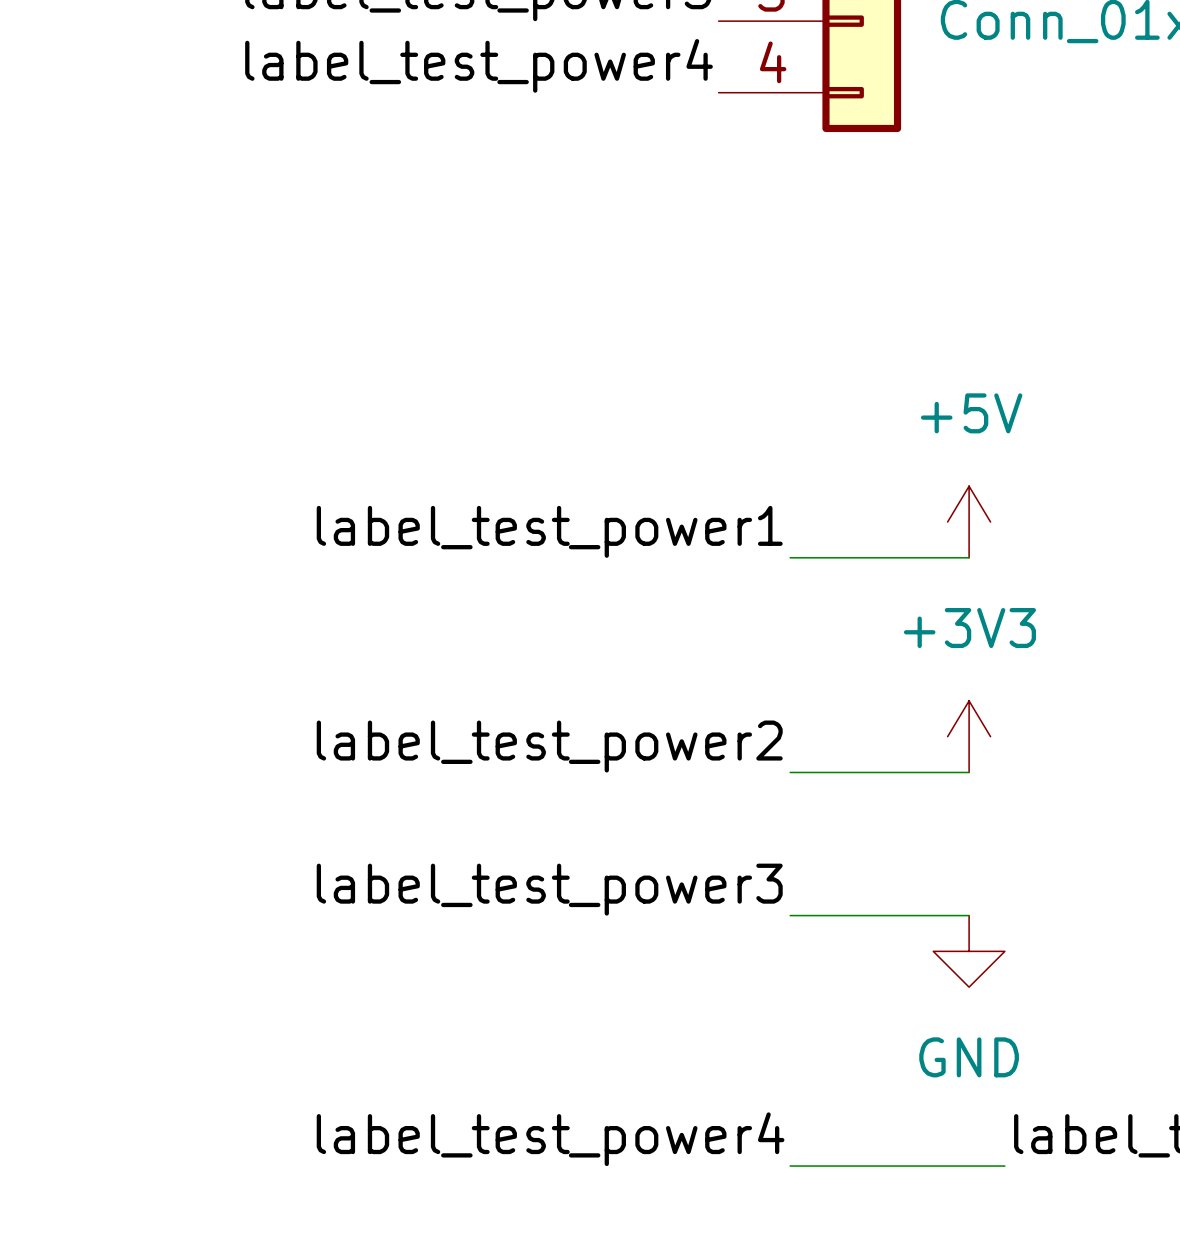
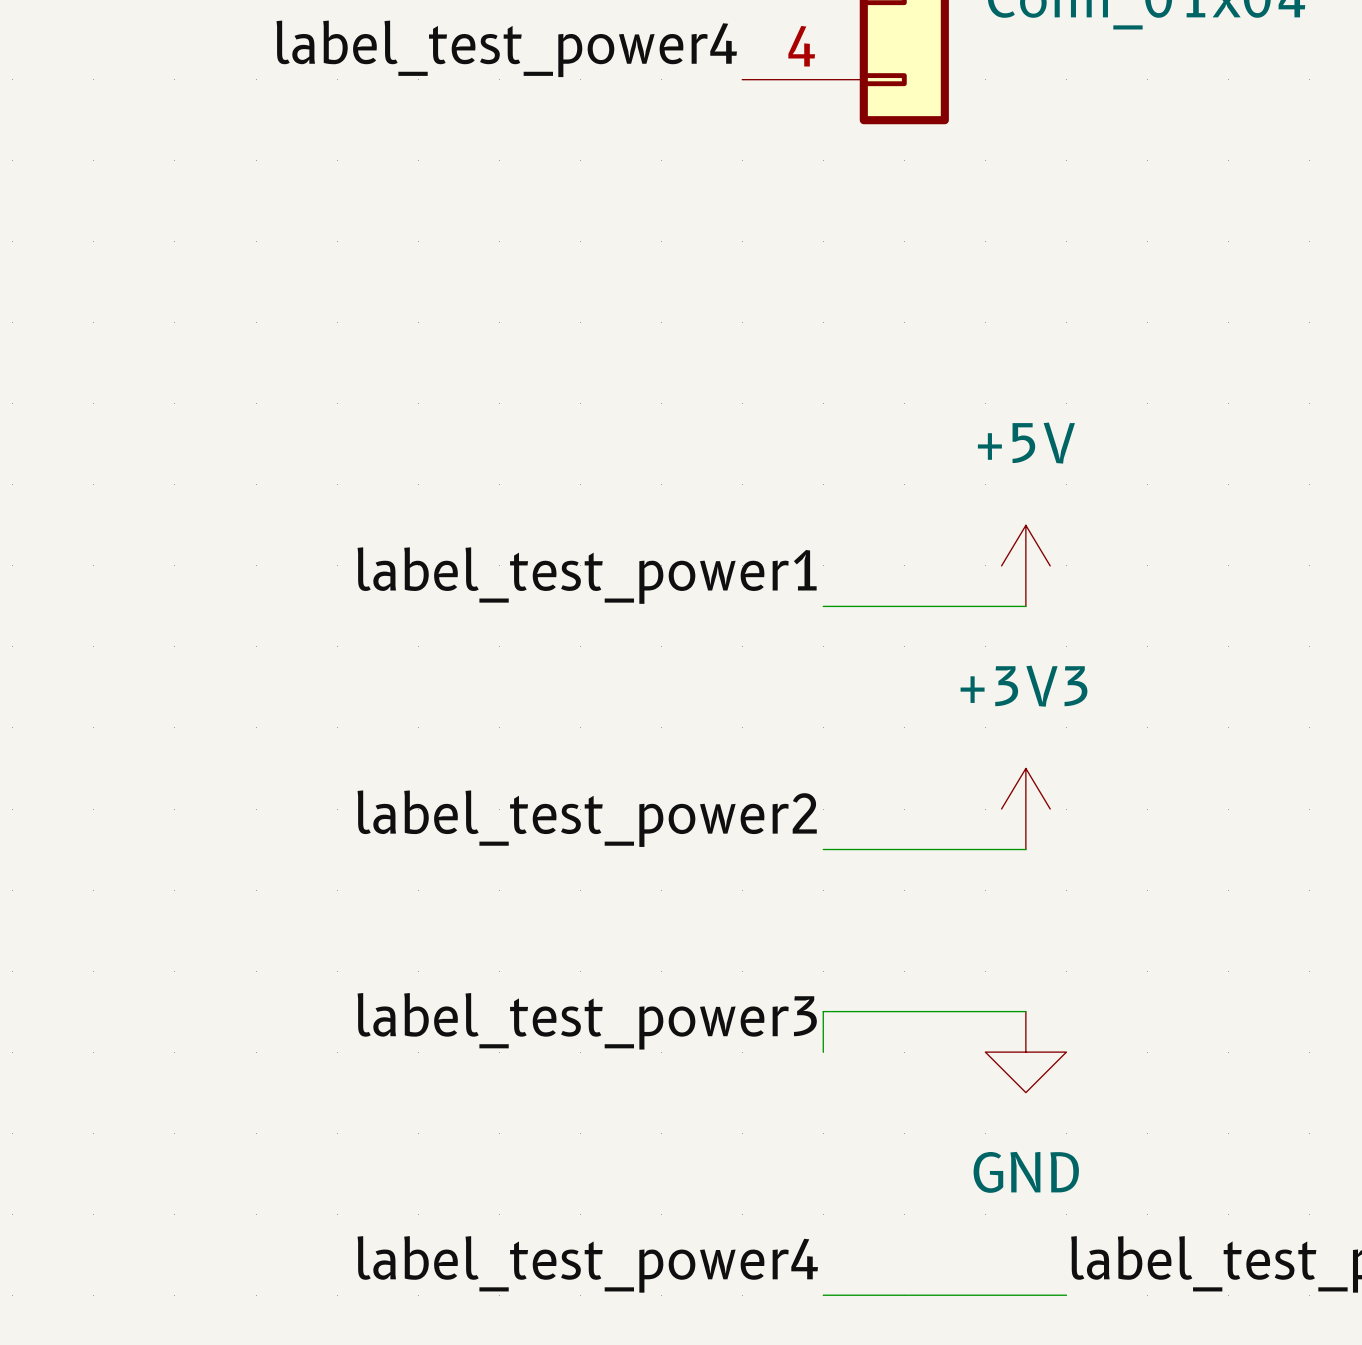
label position: label_test_power3 (549, 889) -> label_test_power3 (587, 1021)
wire: none -> (823, 1011) (823, 1052)

